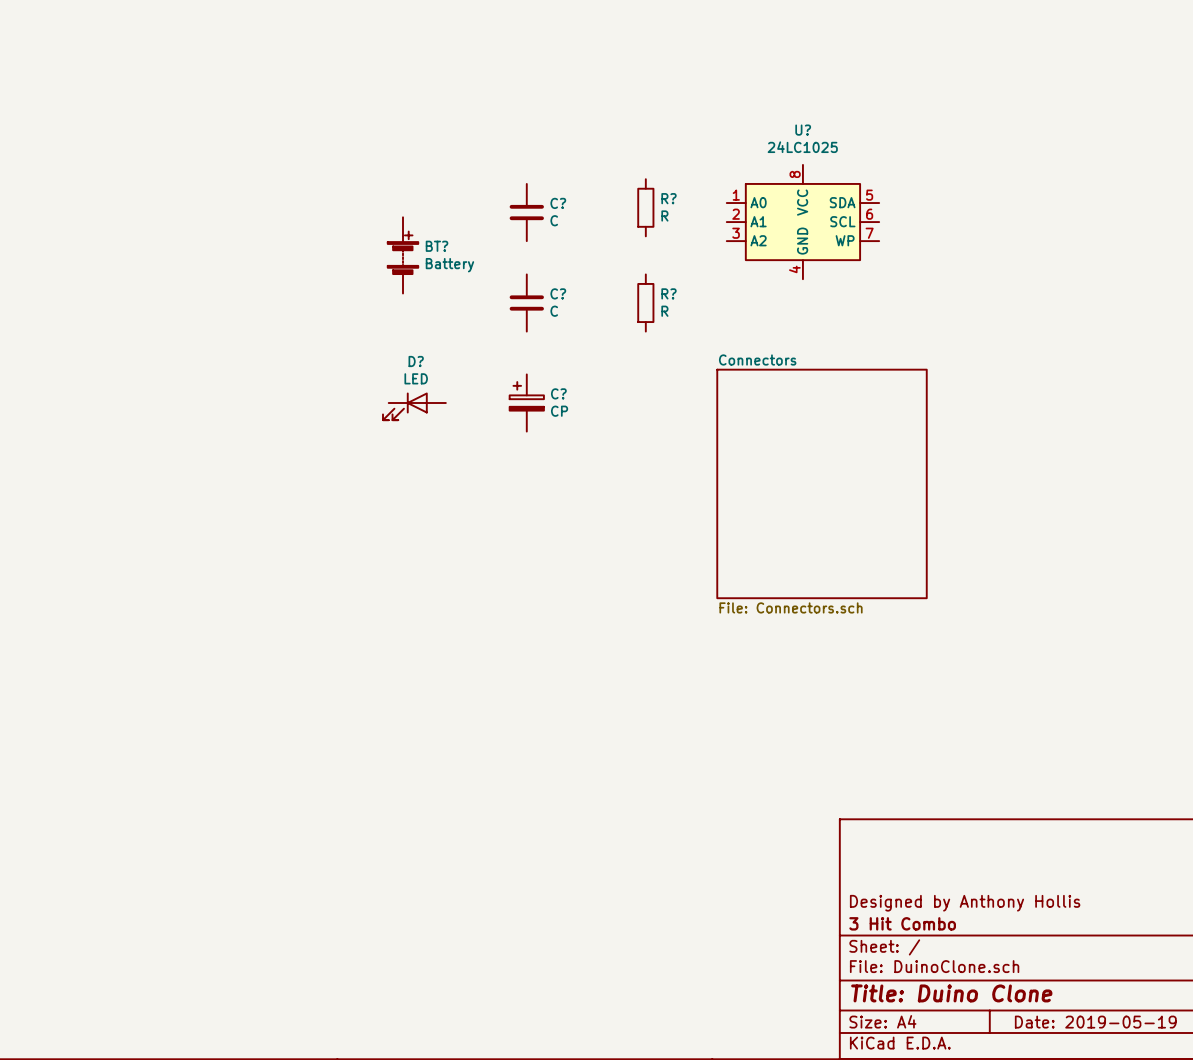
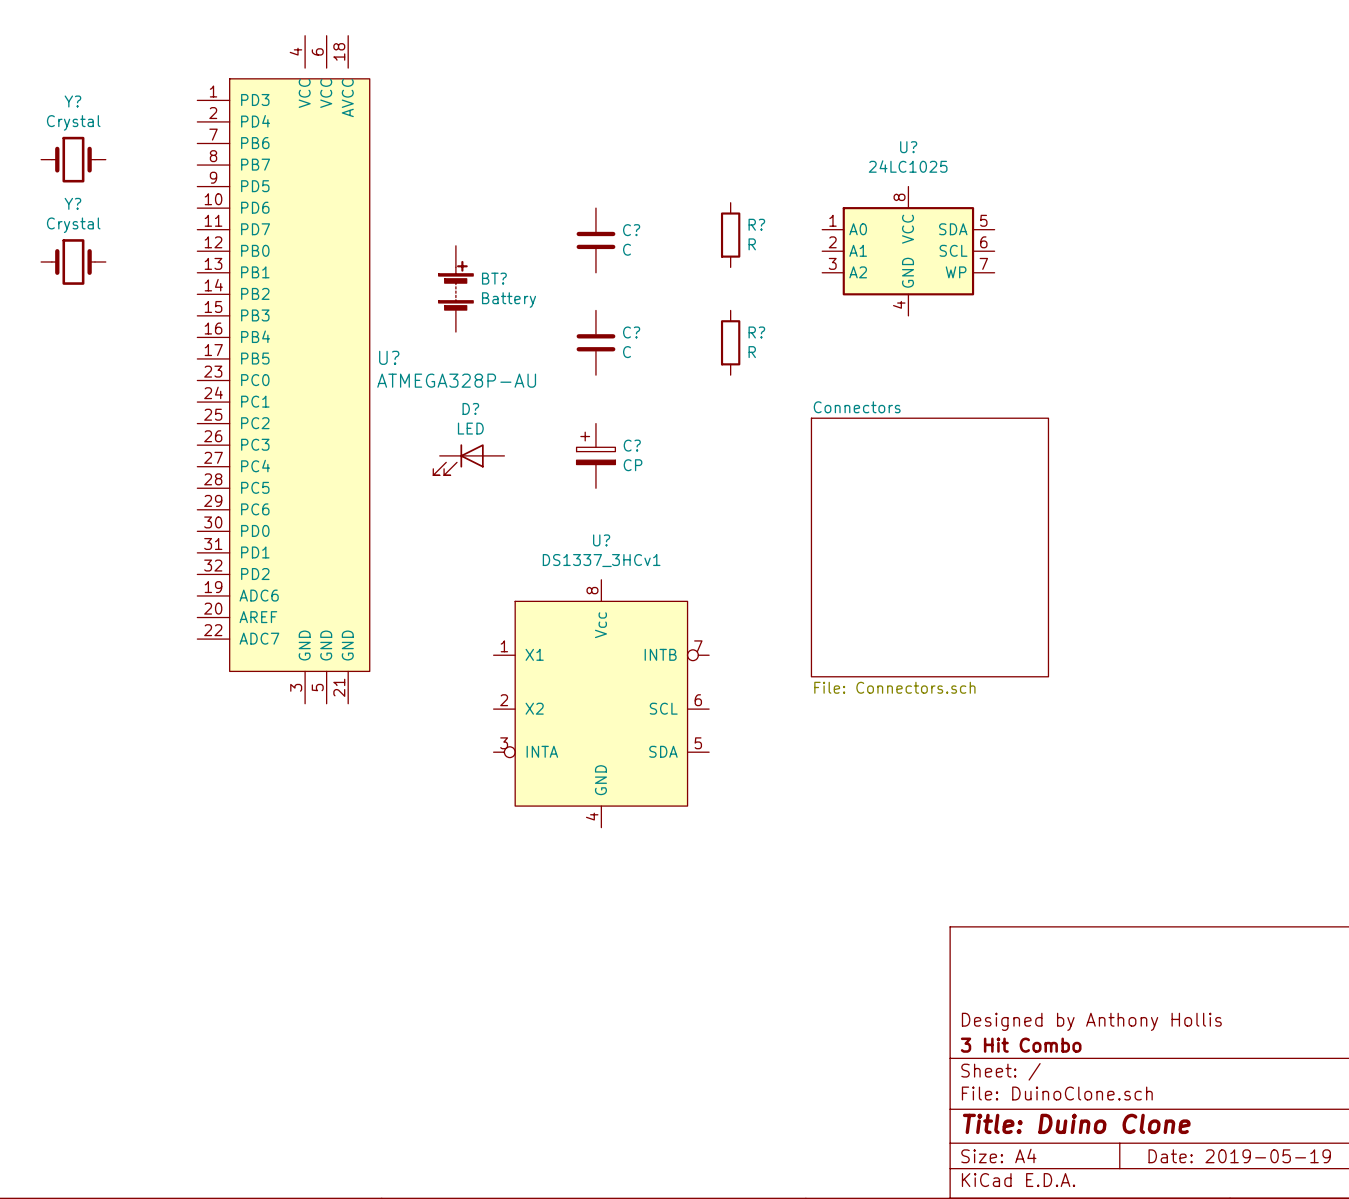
Y?: none -> Crystal (73, 159)
Y?: none -> Crystal (73, 261)
U?: none -> ATMEGA328P-AU (283, 369)
U?: none -> DS1337_3HCv1 (601, 703)

